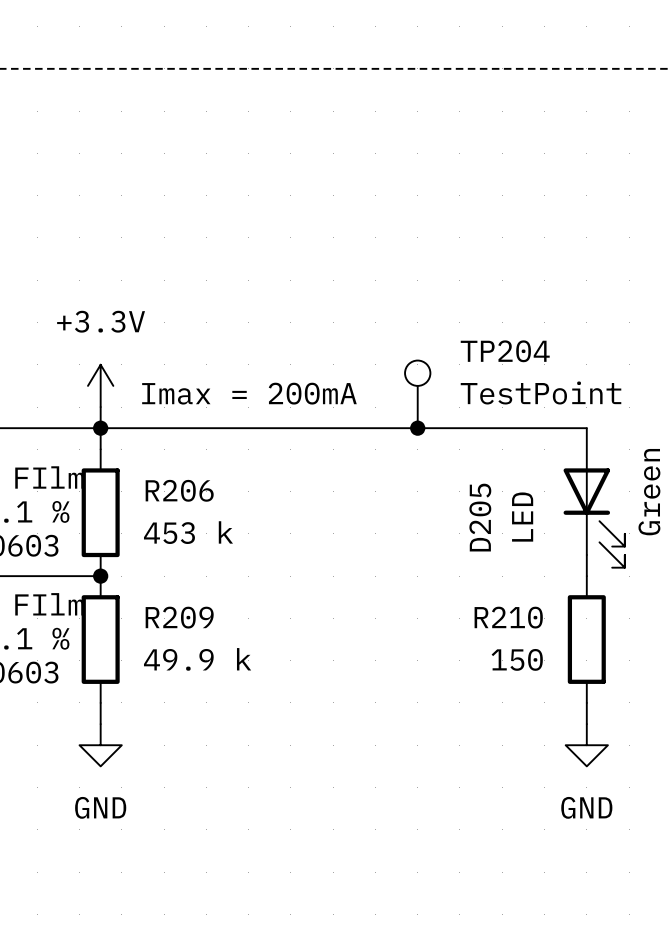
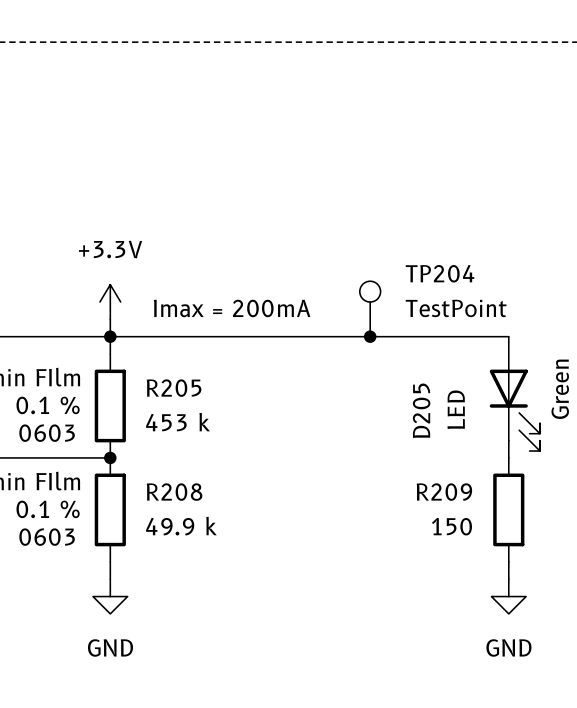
R206 name: R206 (179, 490) -> R205 (174, 388)
R209 name: R209 (179, 617) -> R208 (174, 492)
R210 name: R210 (508, 617) -> R209 (444, 492)

